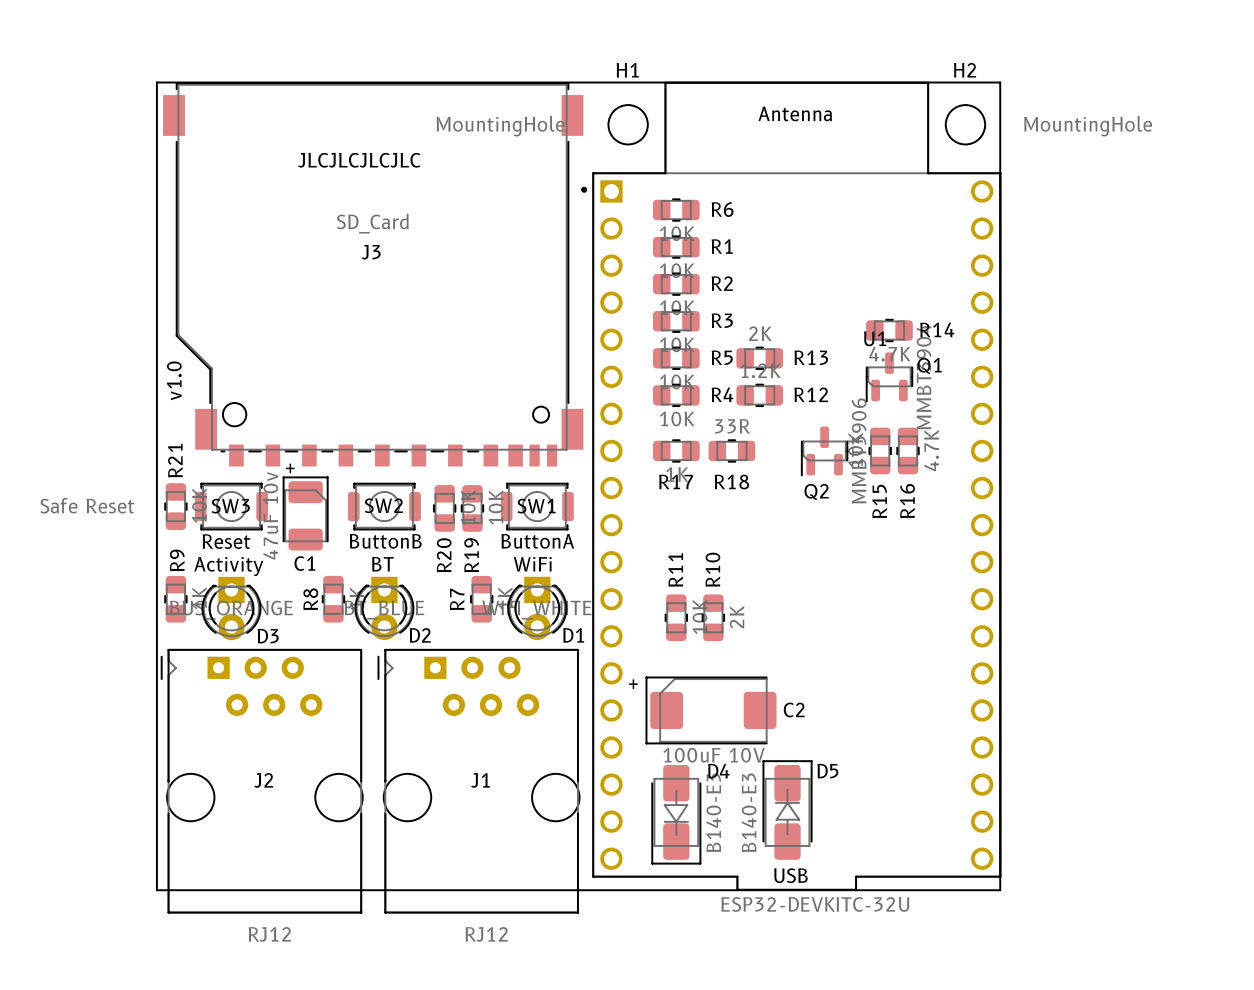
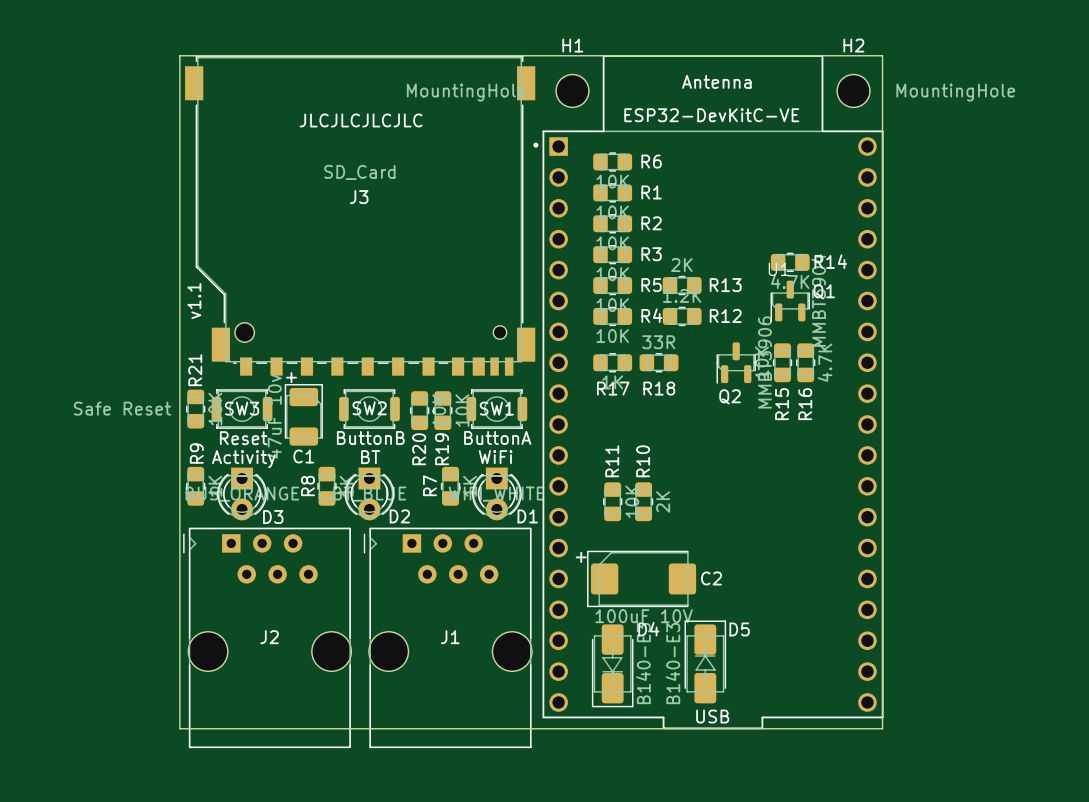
text: v1.0 (174, 380) -> v1.1 (194, 301)
U1 value: ESP32-DEVKITC-32U (815, 904) -> ESP32-DevKitC-VE (711, 115)
J2 value: RJ12 (269, 934) -> none
J1 value: RJ12 (486, 934) -> none

